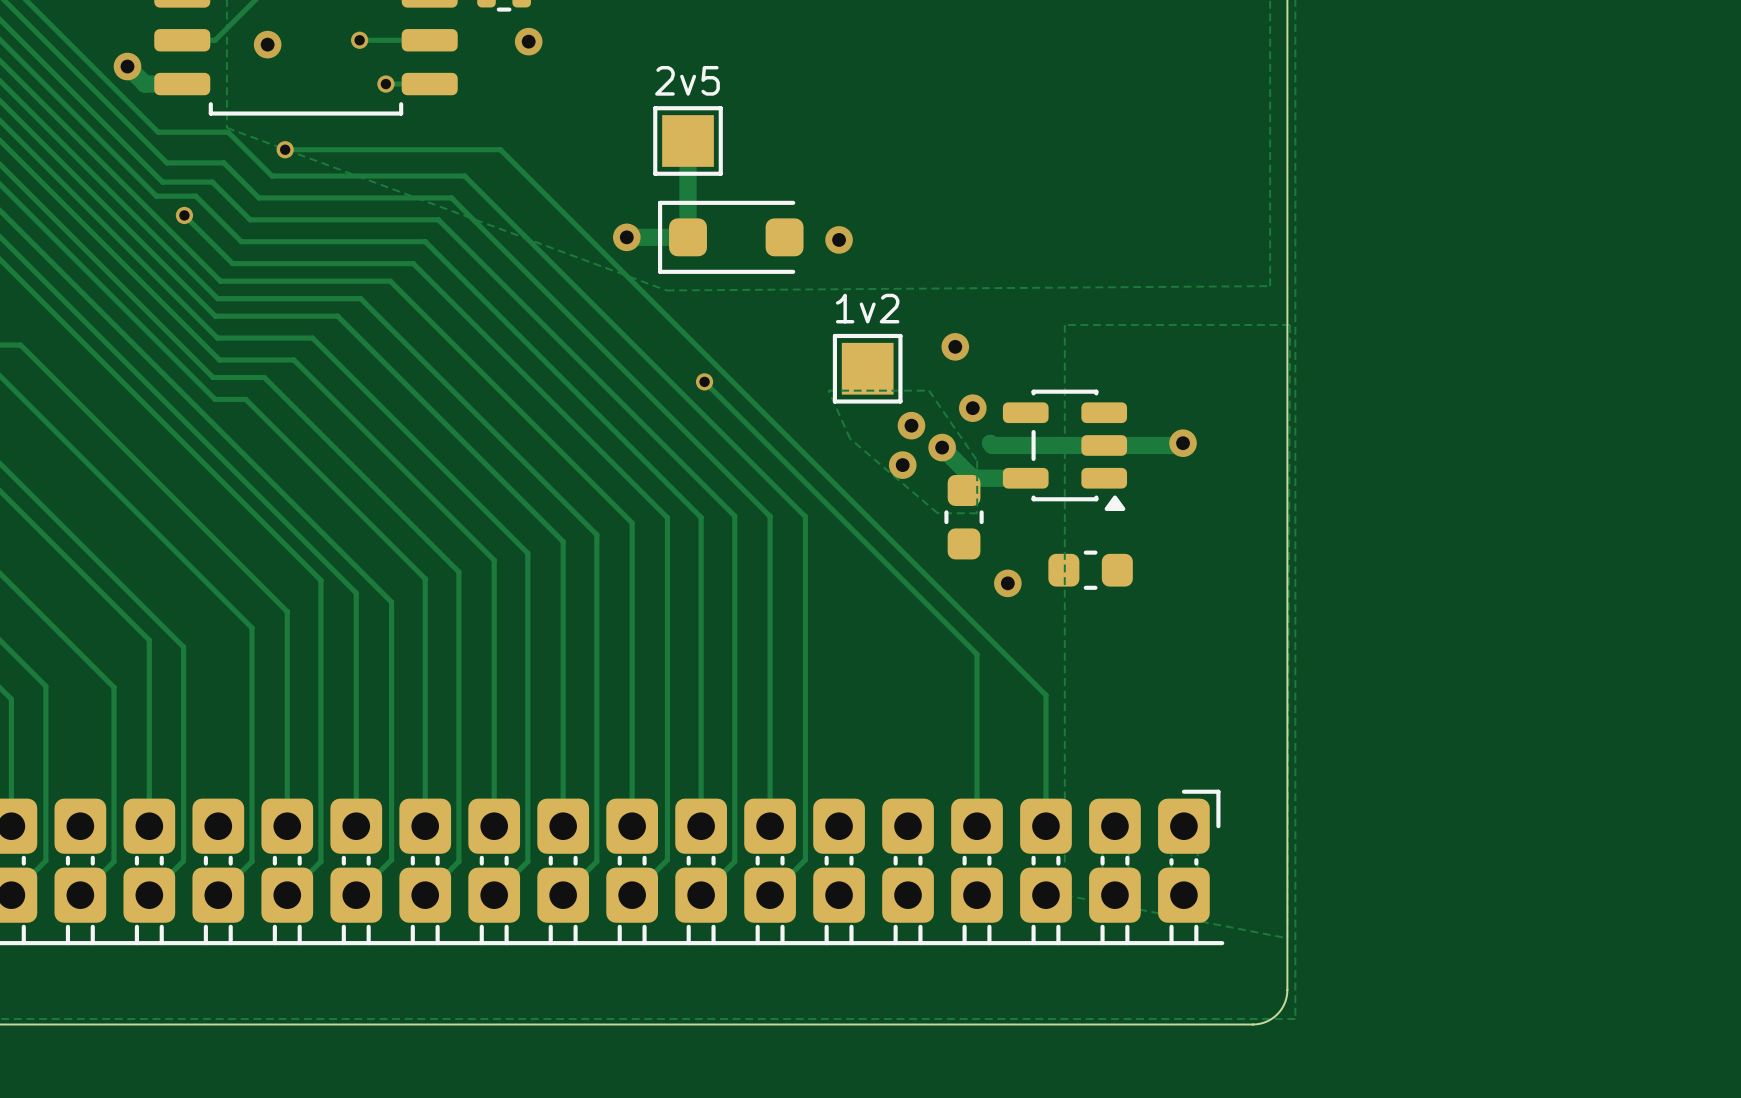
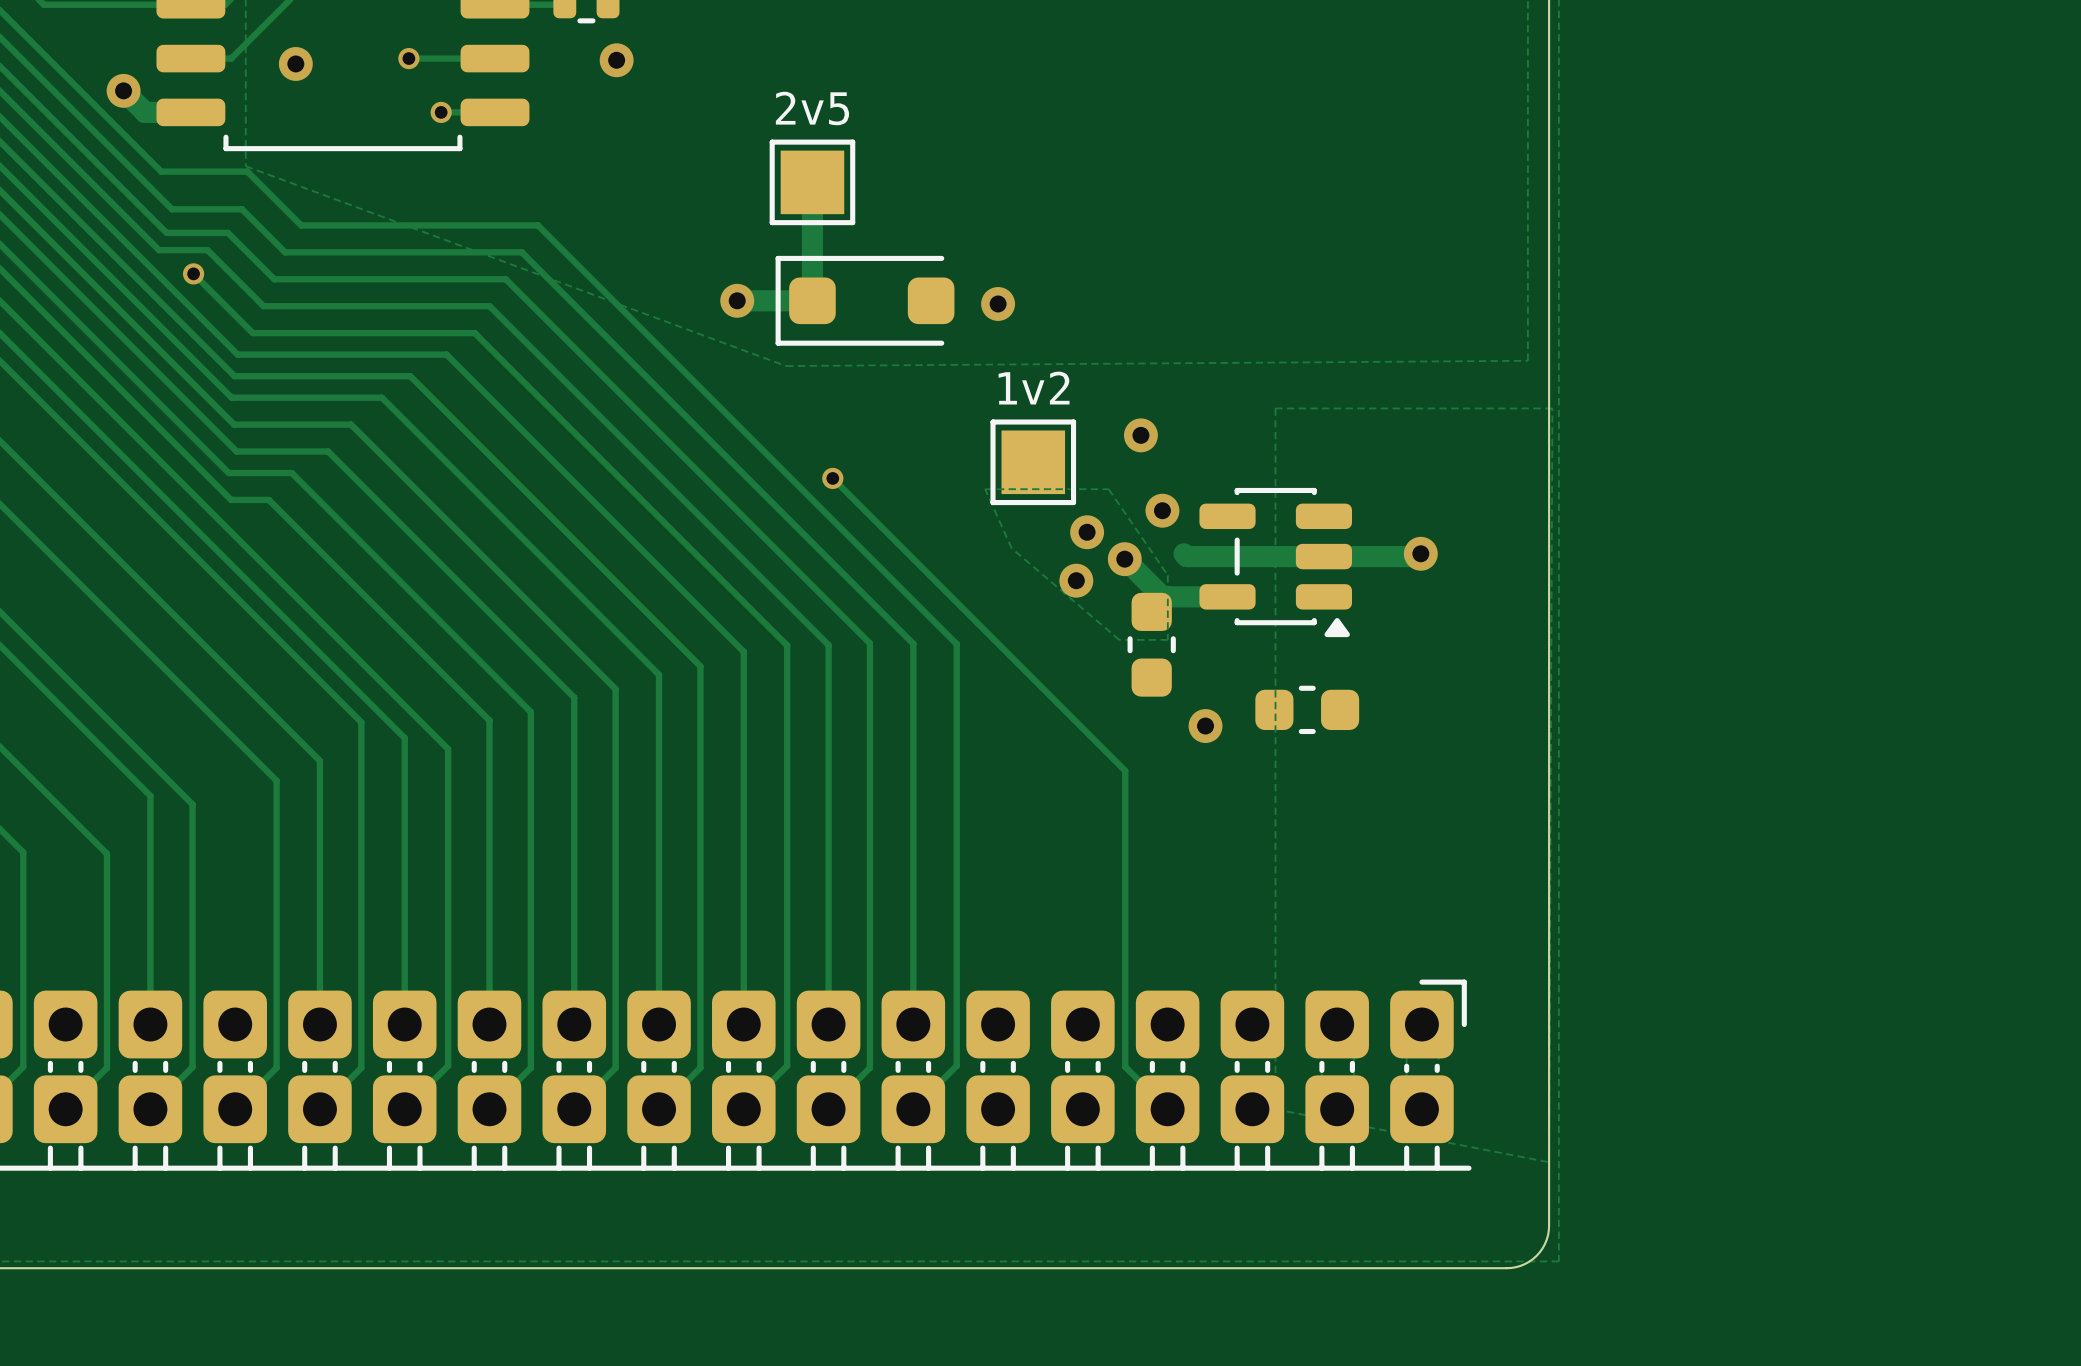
track: (285, 149) (500, 149) (1045, 695) (1045, 826) -> none
via: (285, 149) -> none
track: (942, 619) (977, 654) (977, 826) -> (1125, 770) (1125, 1066) (1167, 1109)

